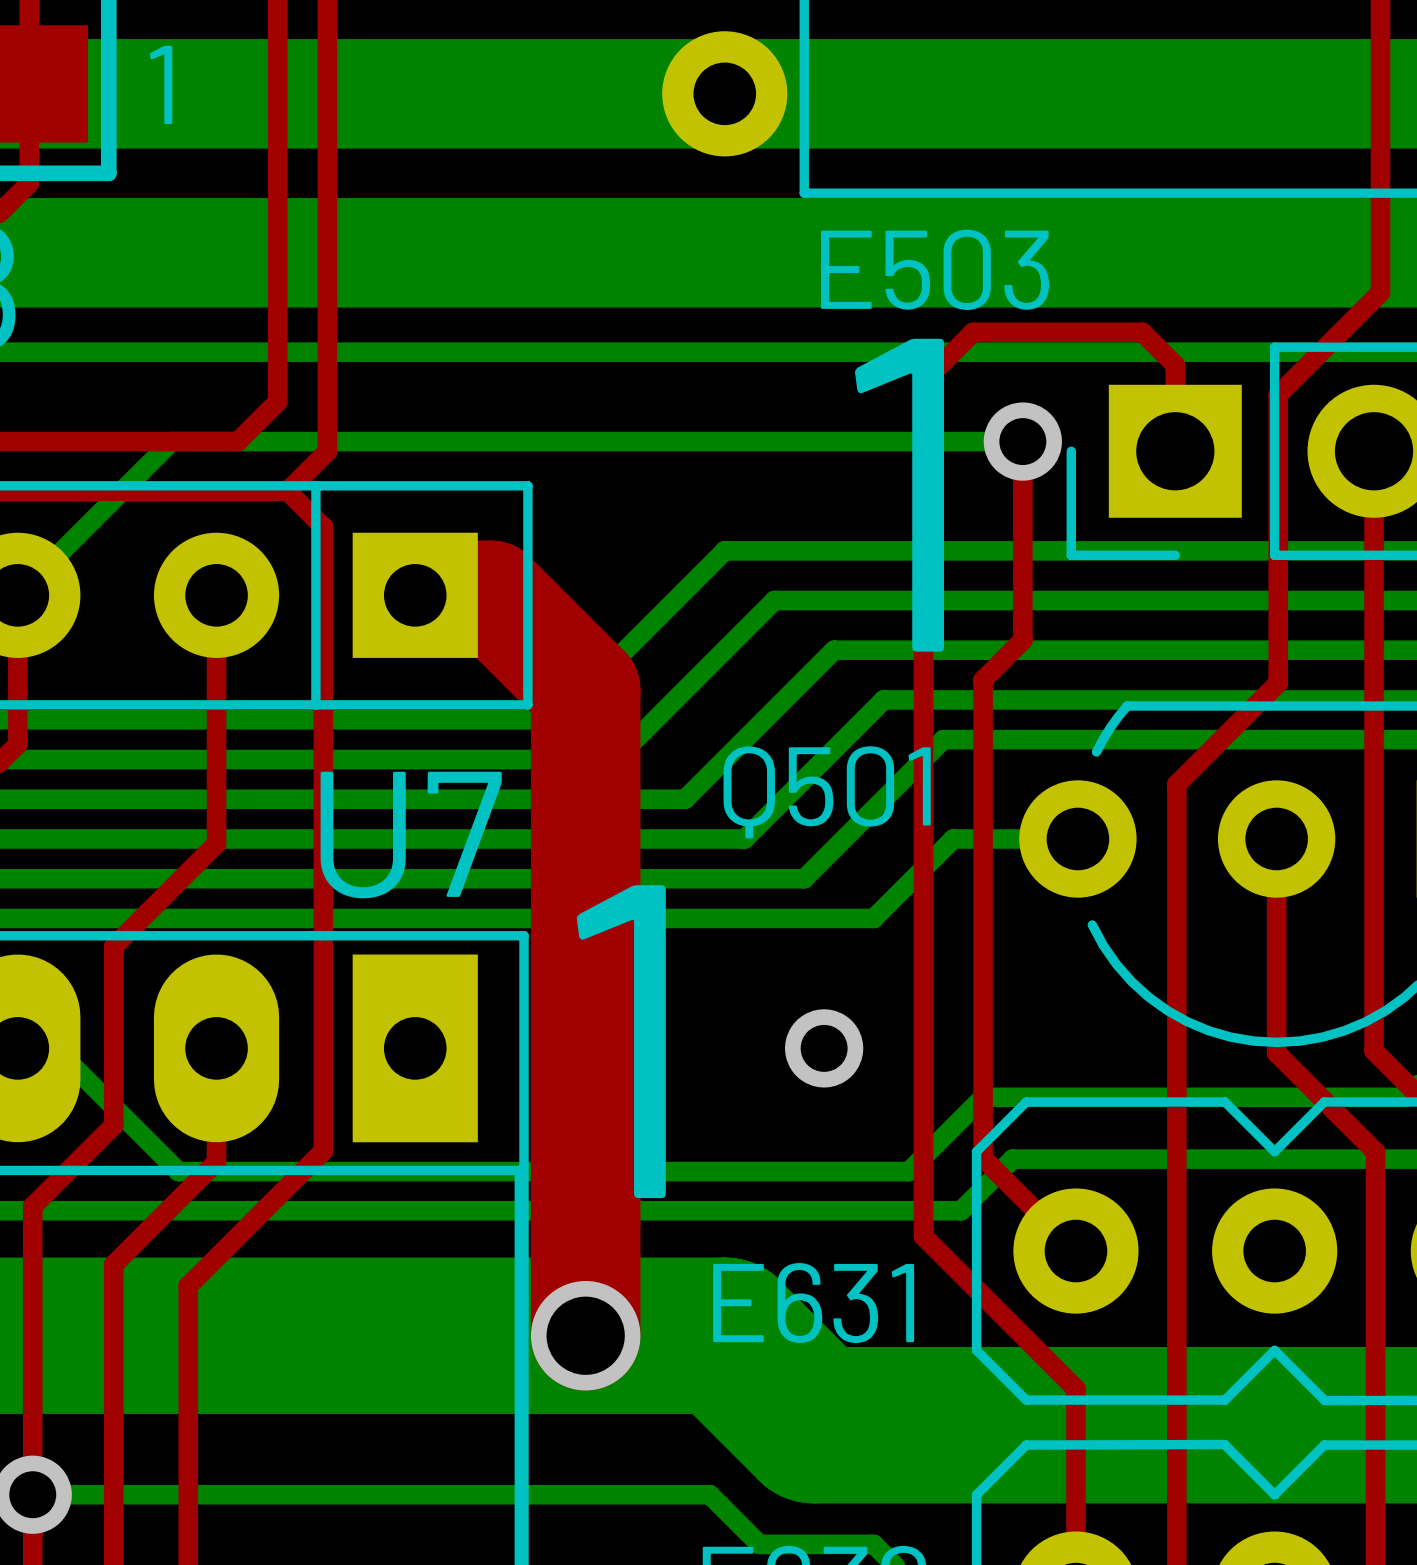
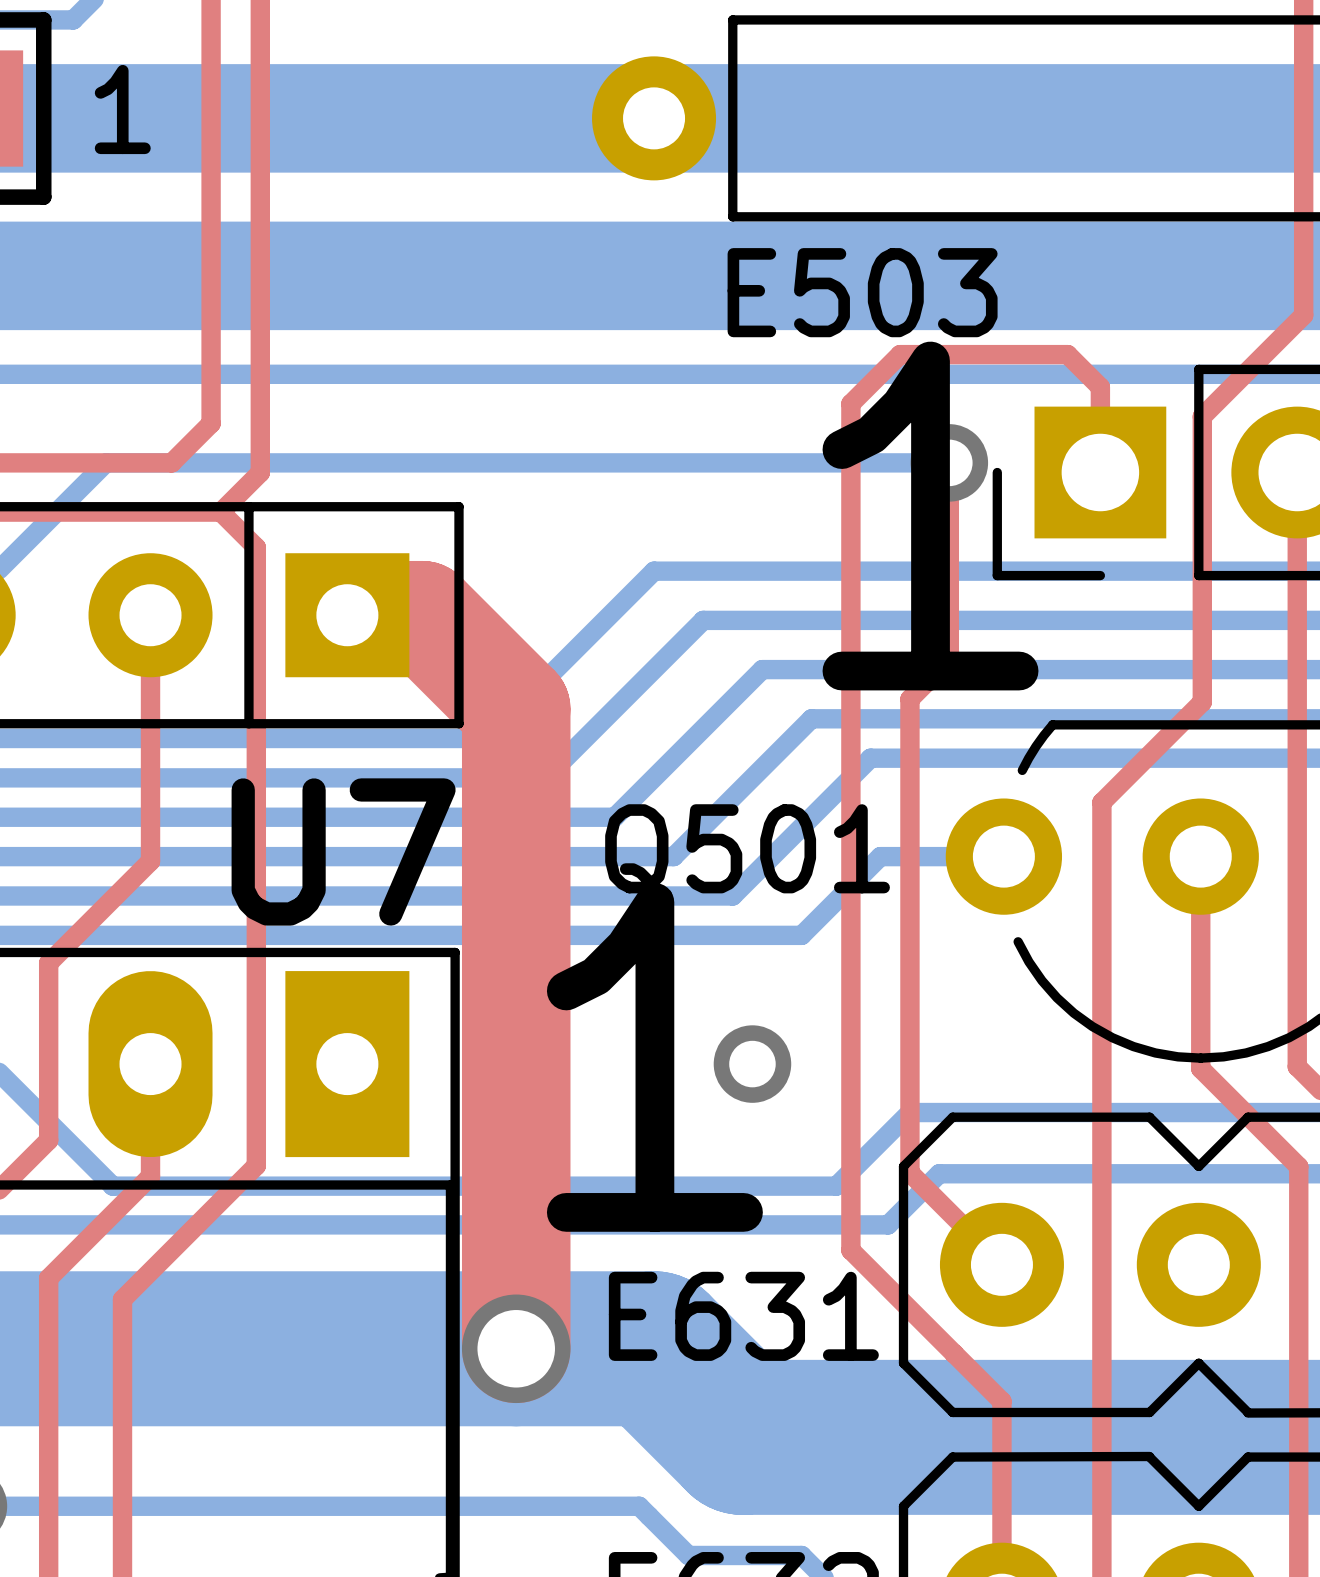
Q501 name position: Q501 (827, 792) -> Q501 (747, 852)

